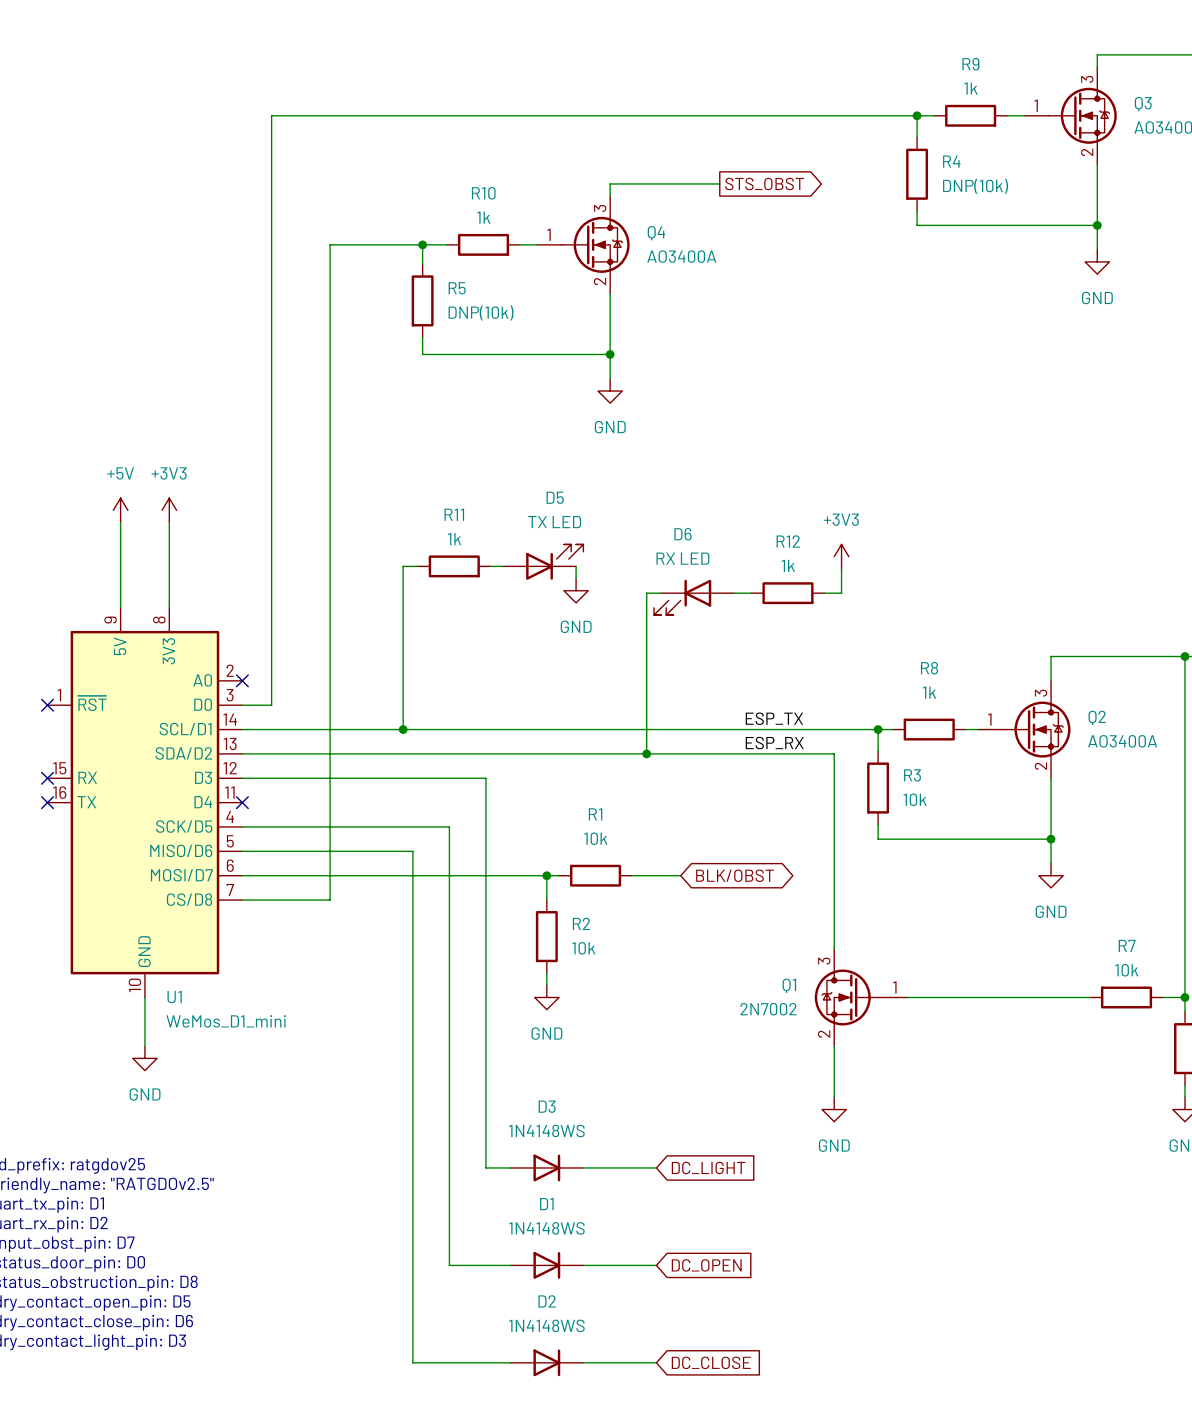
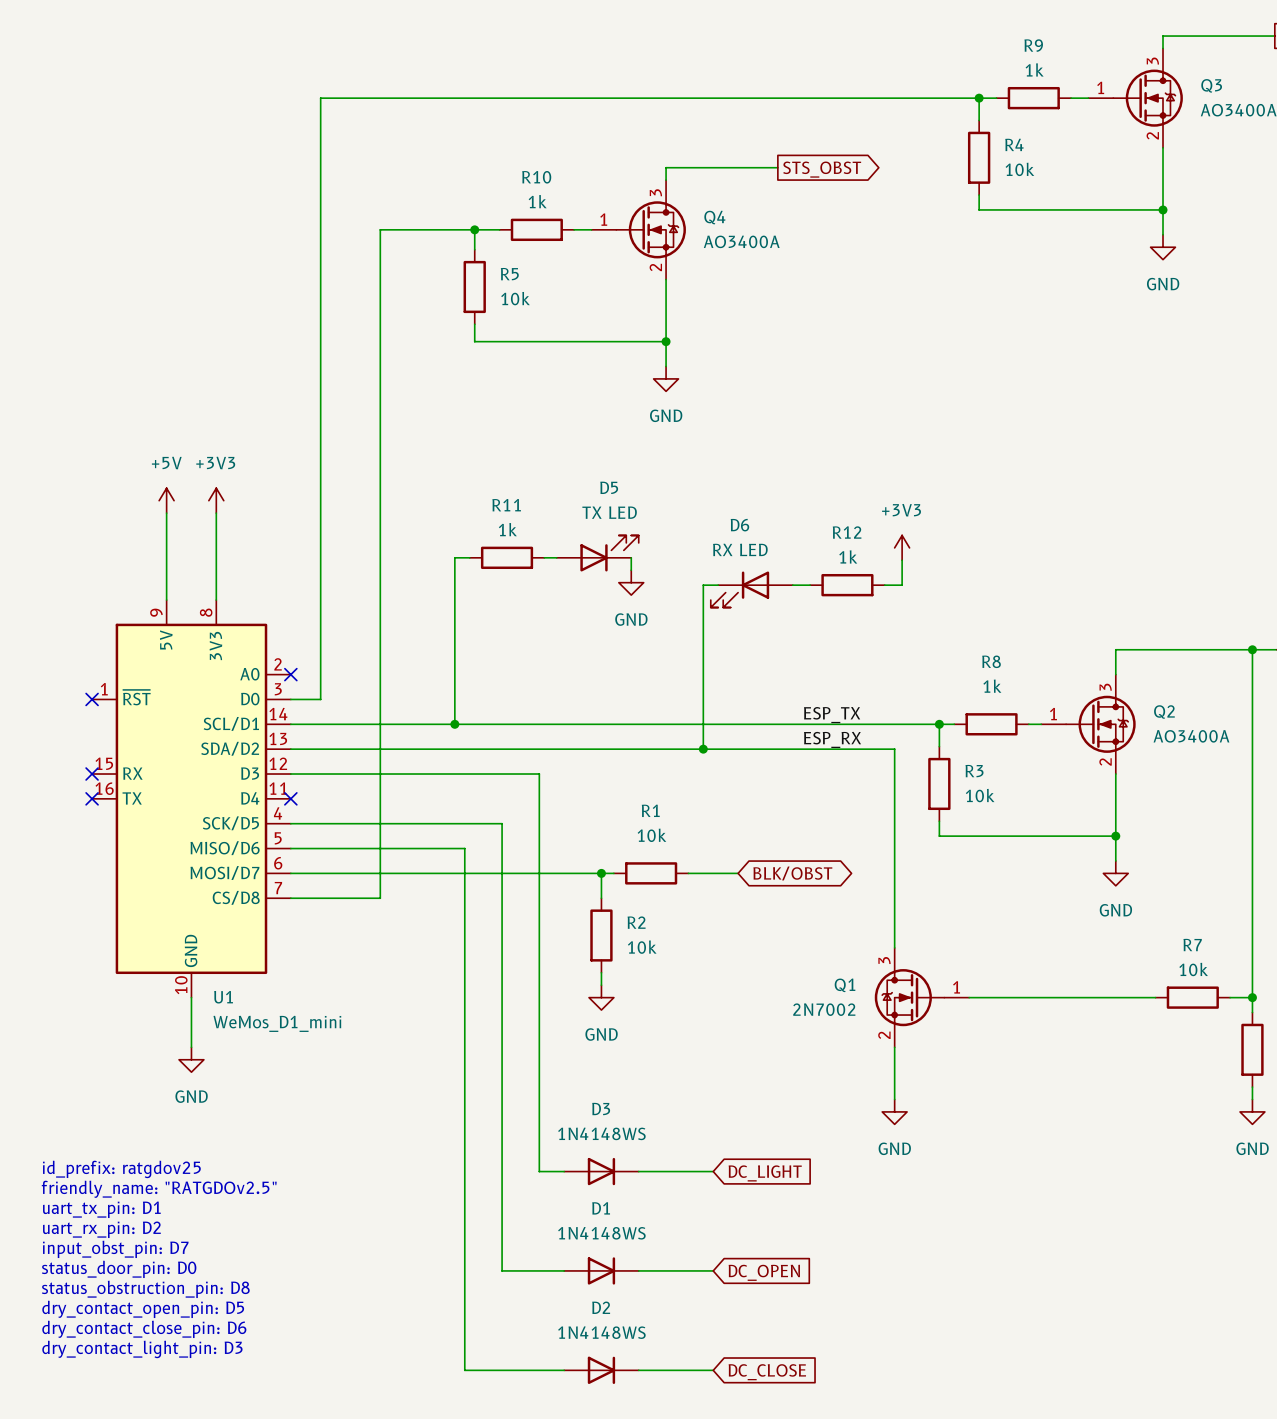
R4 value: DNP(10k) (975, 186) -> 10k (1019, 169)
R5 value: DNP(10k) (481, 312) -> 10k (515, 298)

